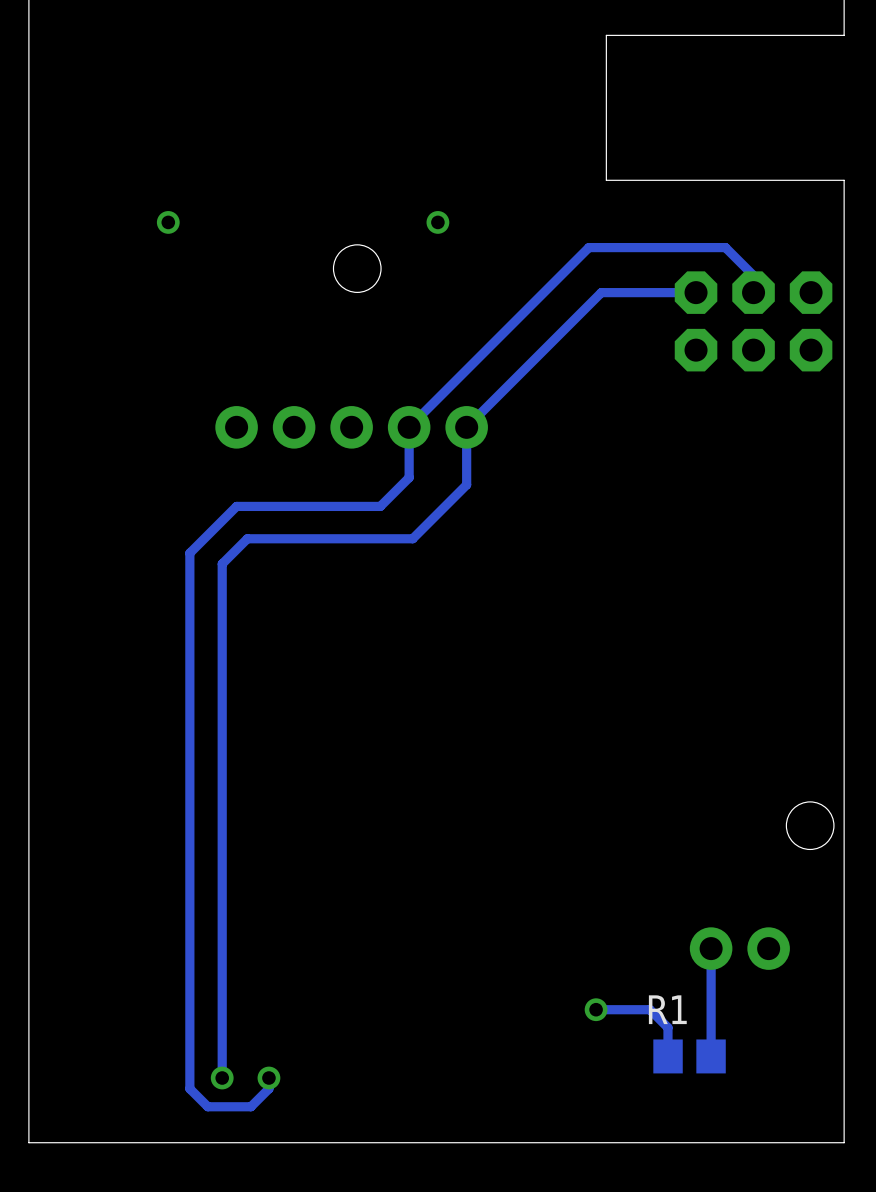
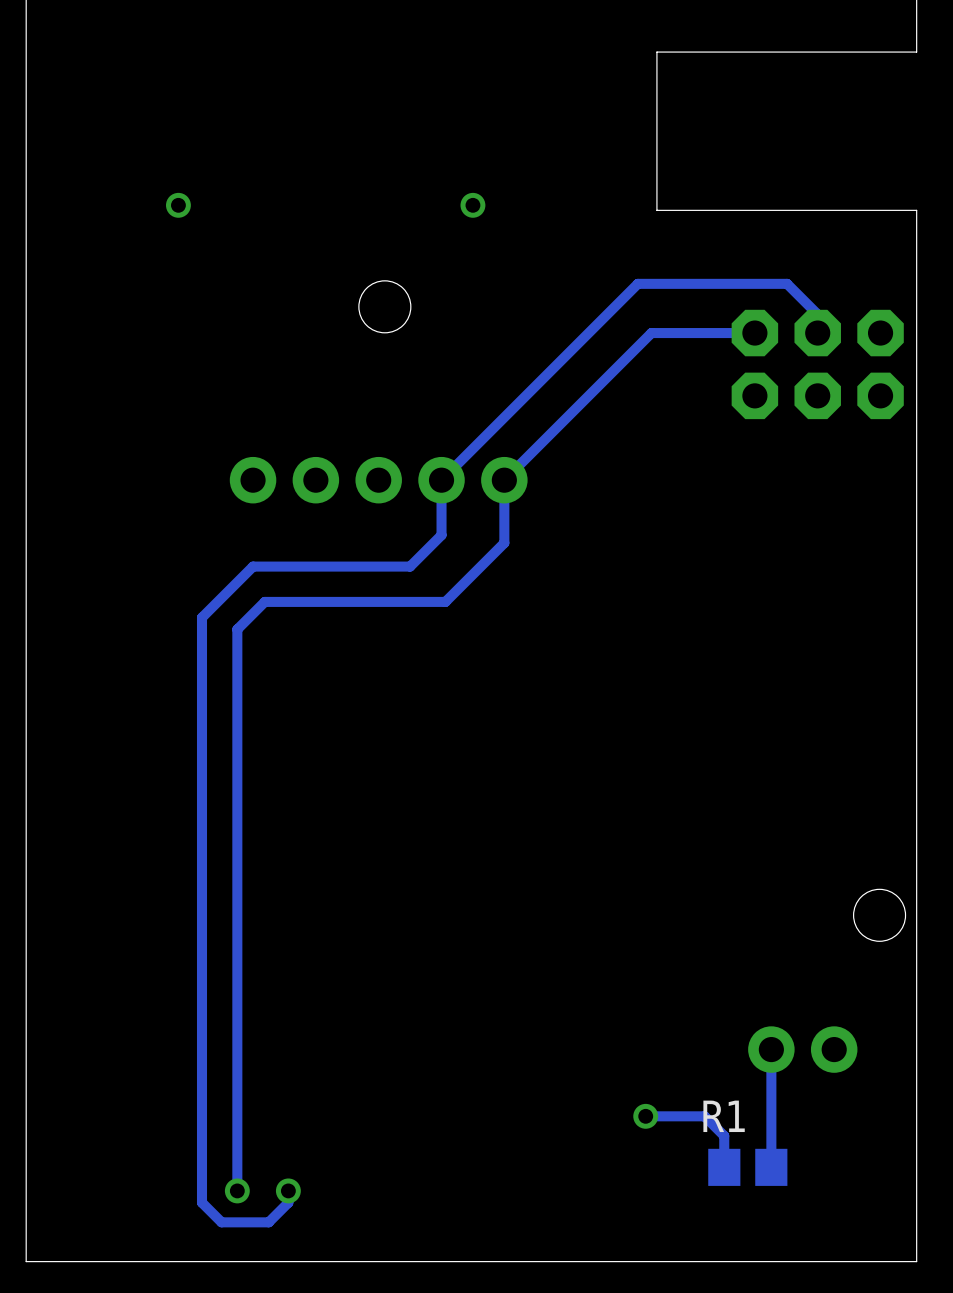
via position: (168, 222) -> (178, 205)
via position: (437, 222) -> (472, 205)

